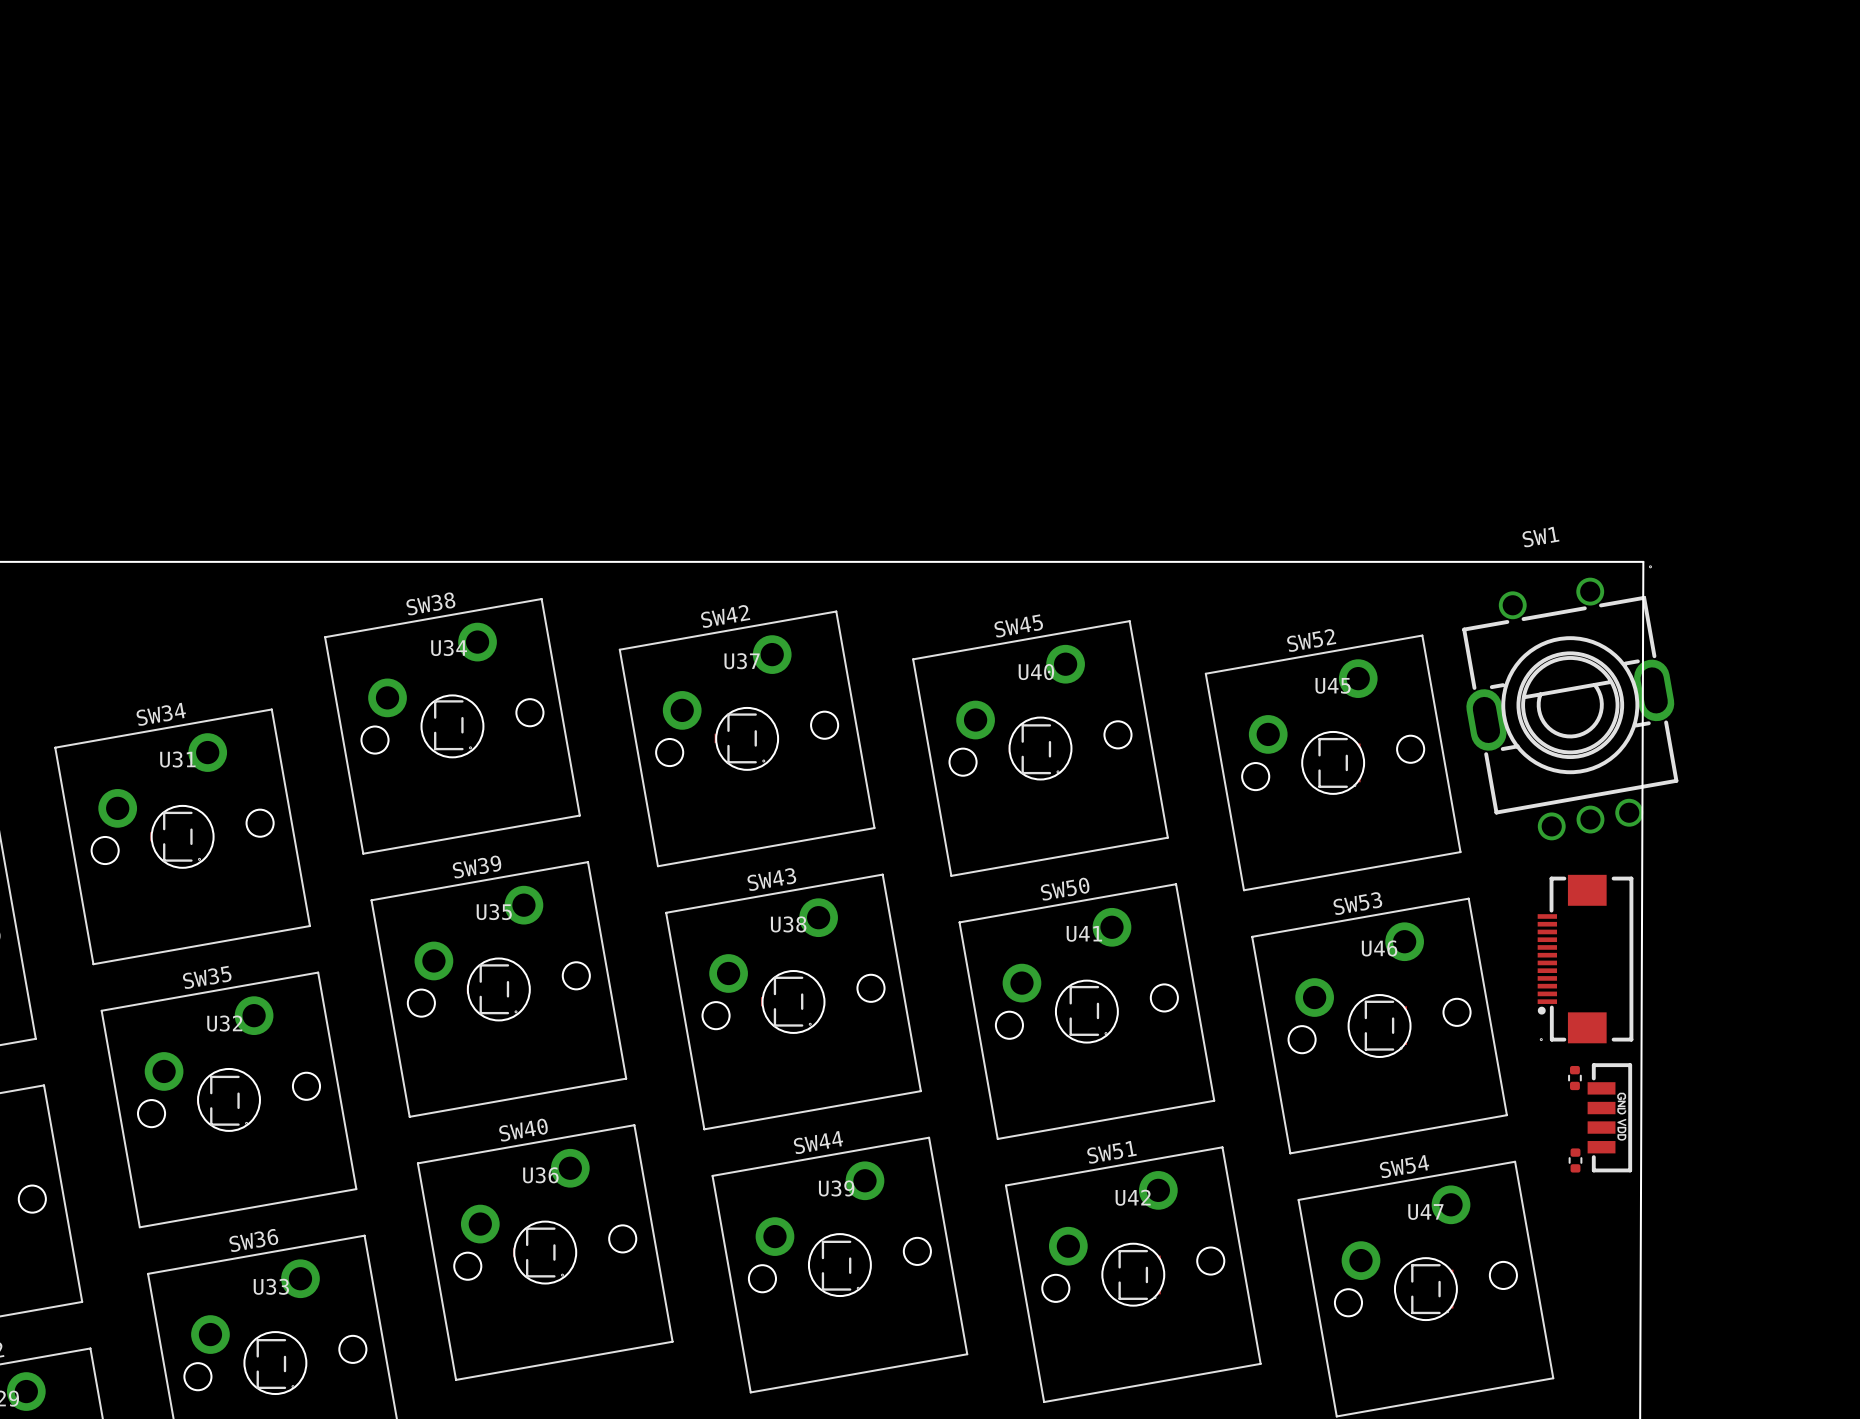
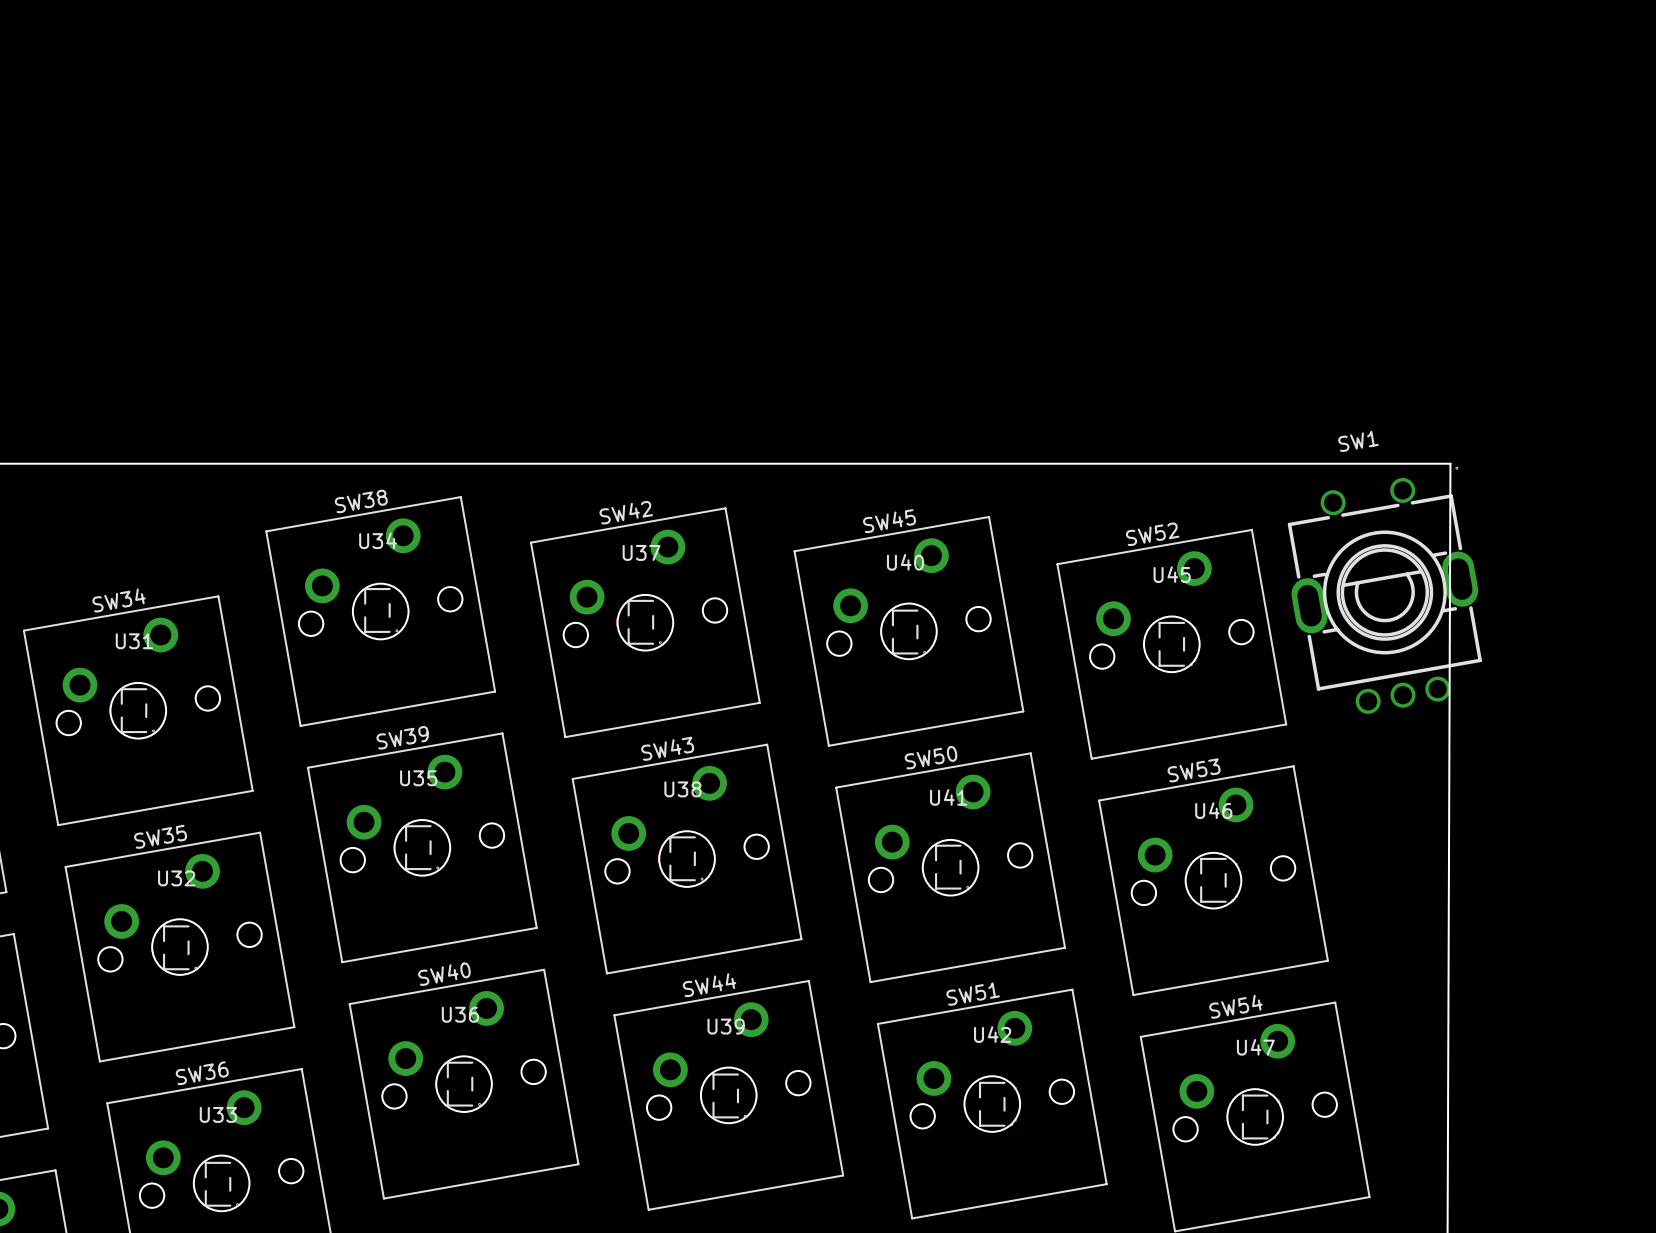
part: (1585, 959) -> none
part: (1574, 1078) -> none
part: (1609, 1117) -> none
part: (1575, 1160) -> none

